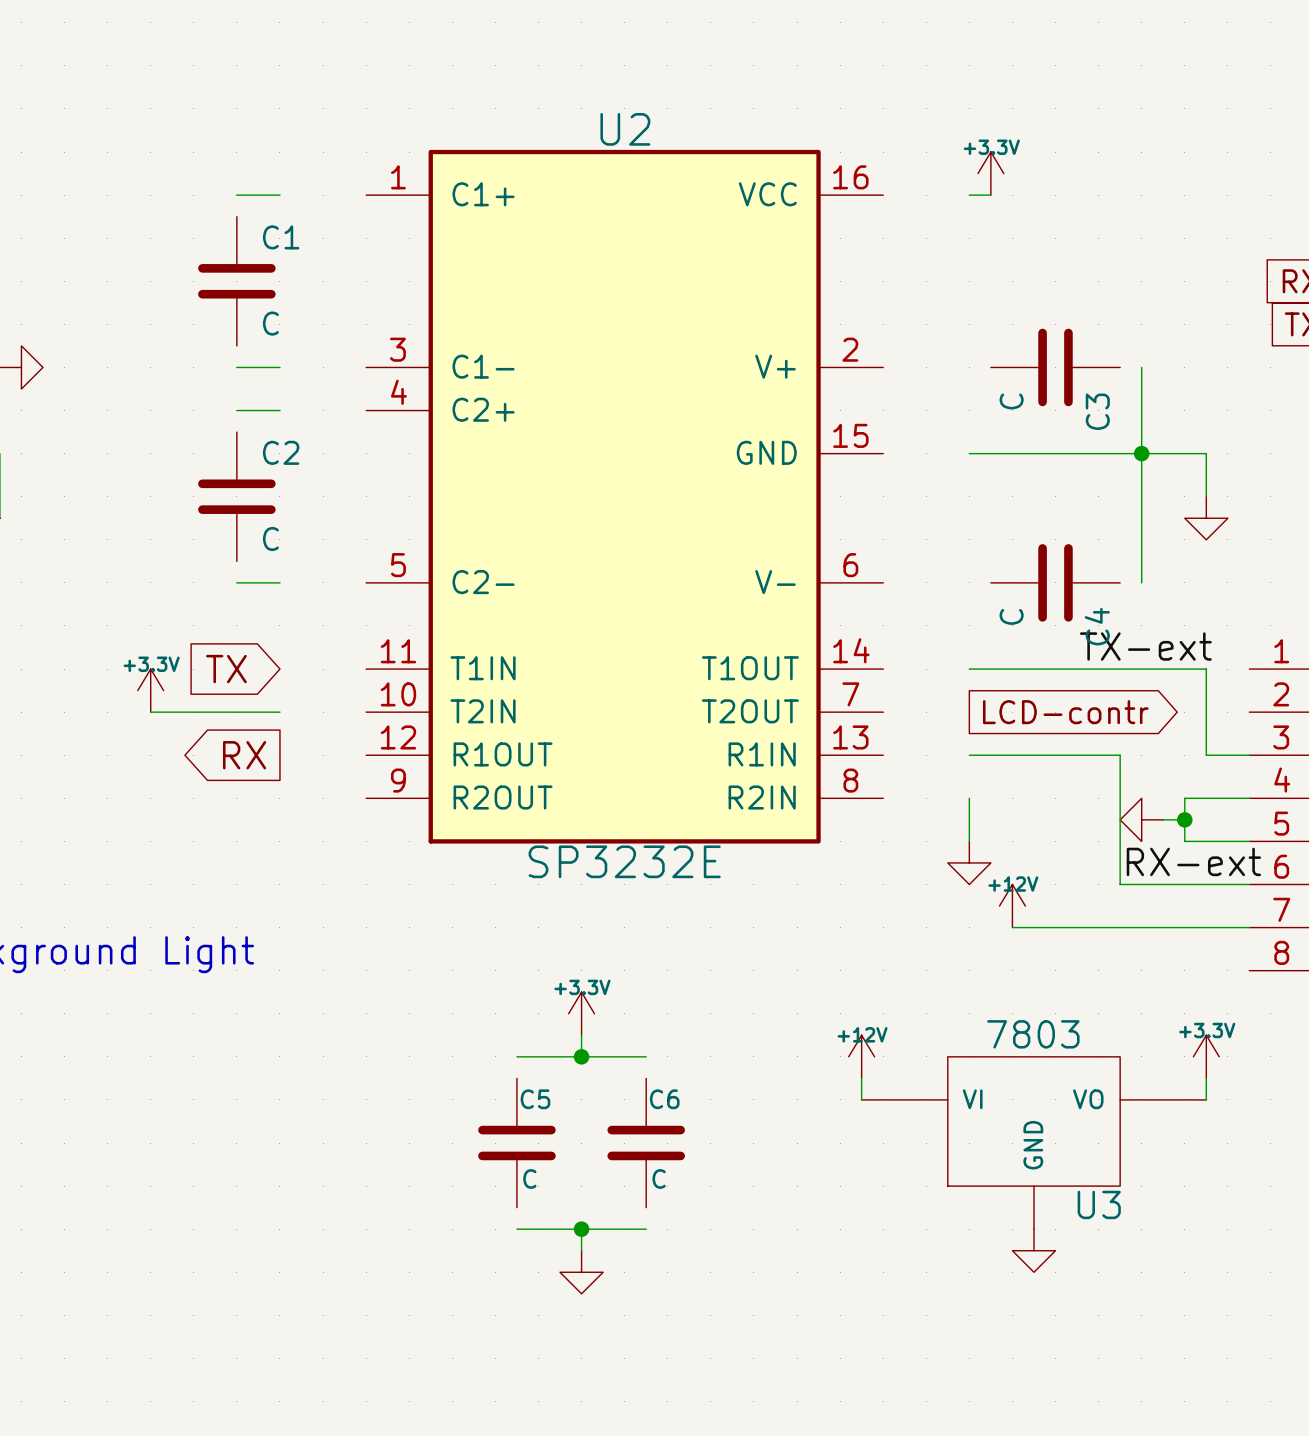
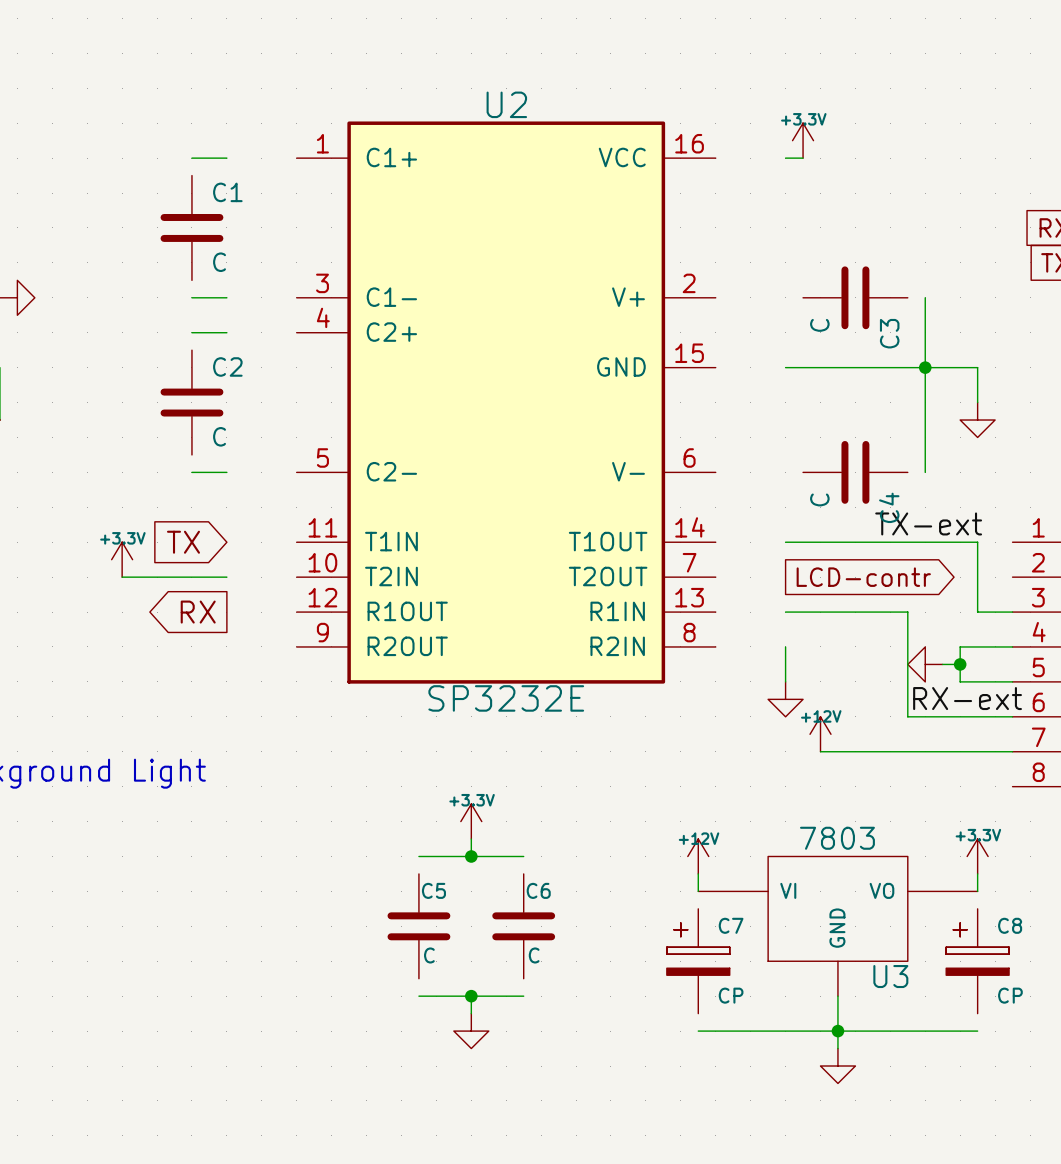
C7: none -> CP (698, 961)
C8: none -> CP (977, 961)
wire: none -> (837, 996) (837, 1048)
power symbol position: (1033, 1250) -> (837, 1066)
wire: none -> (698, 1031) (977, 1031)
junction: none -> (837, 1031)

